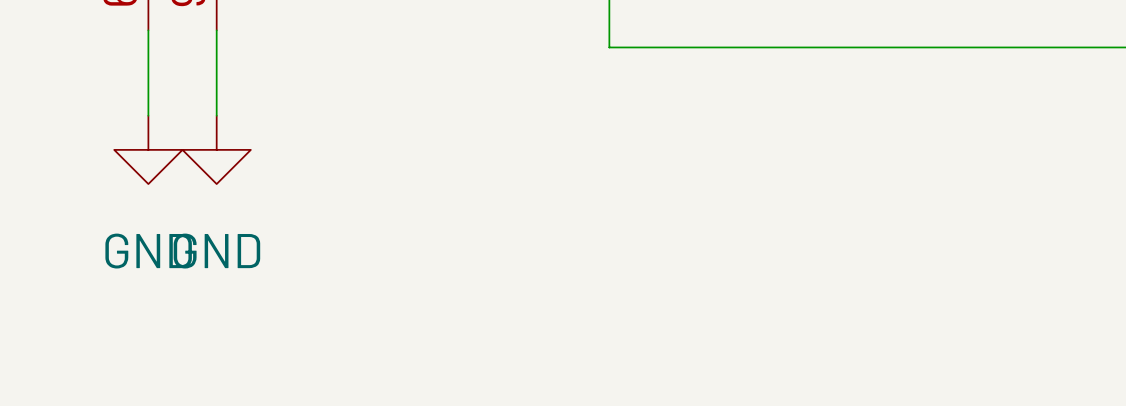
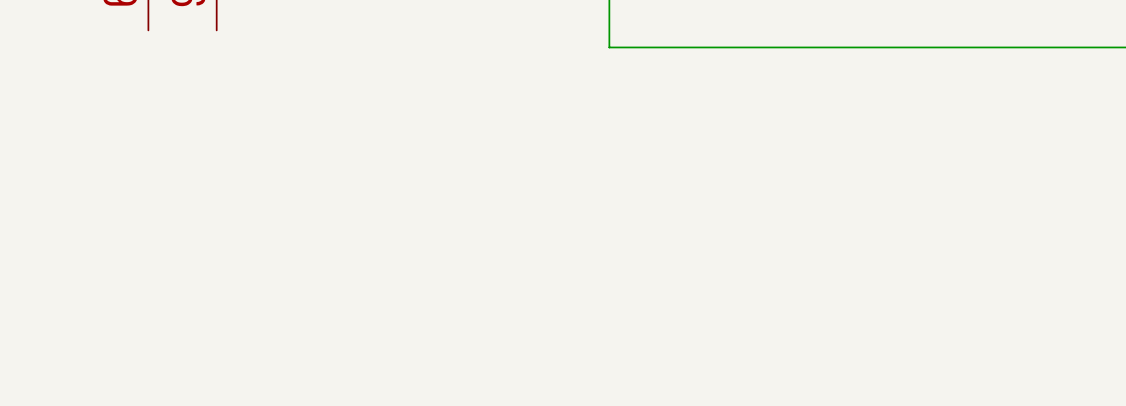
wire: (148, 30) (148, 115) -> none
wire: (216, 30) (216, 115) -> none
power symbol: GND (148, 149) -> none
power symbol: GND (216, 149) -> none

